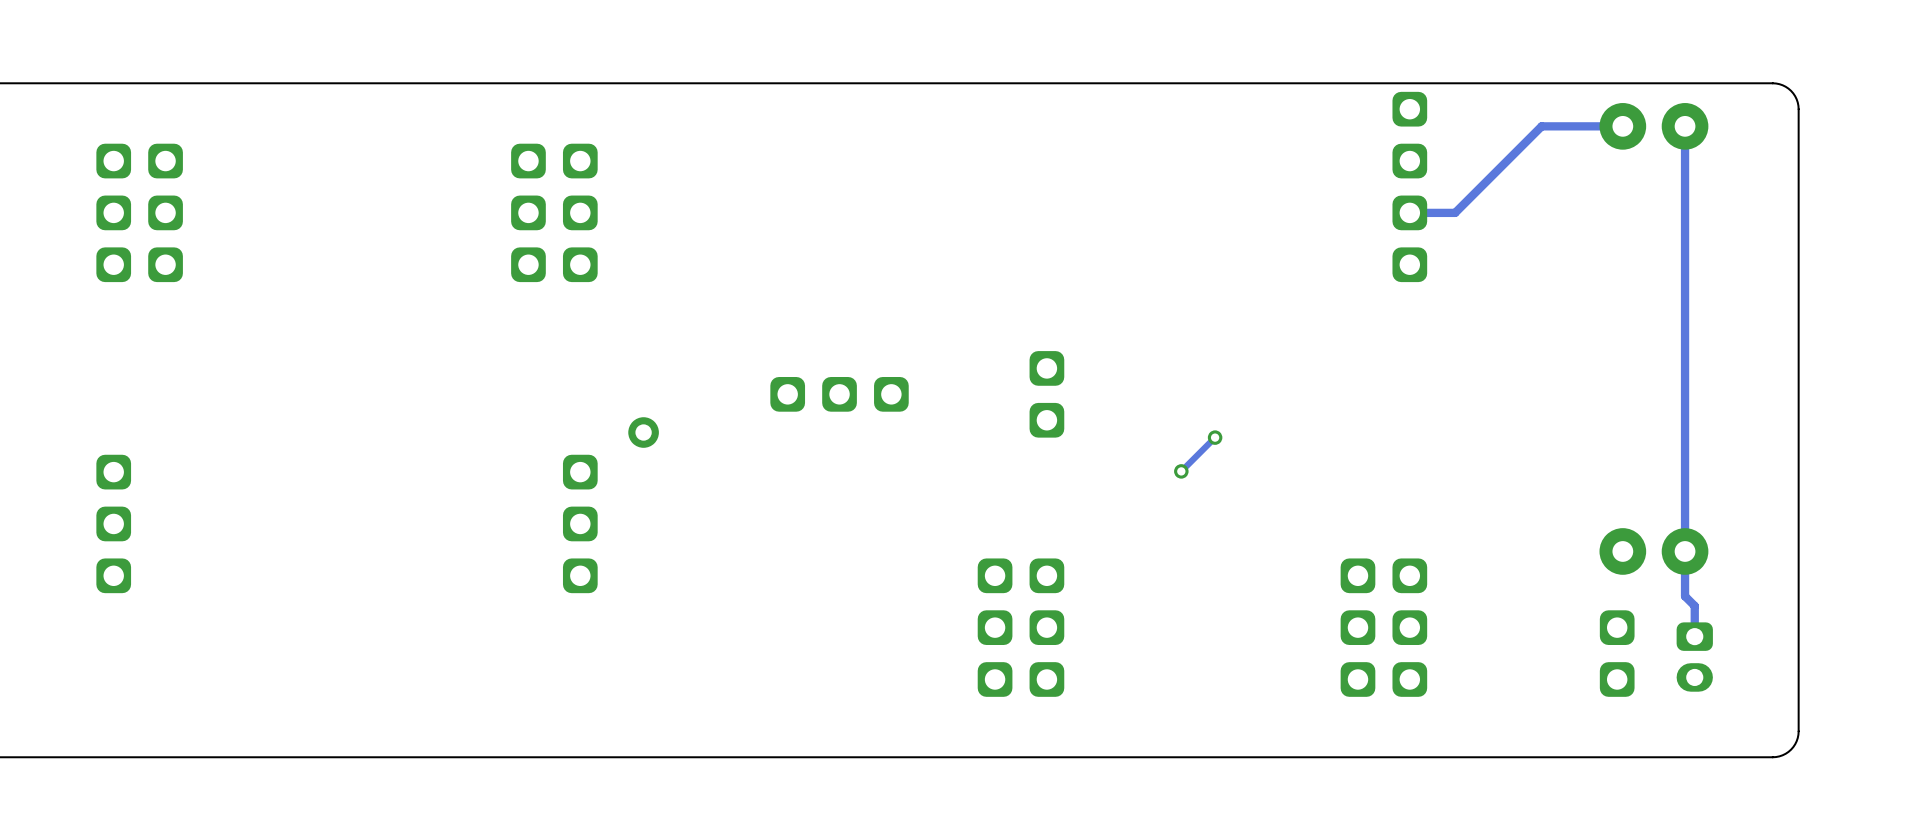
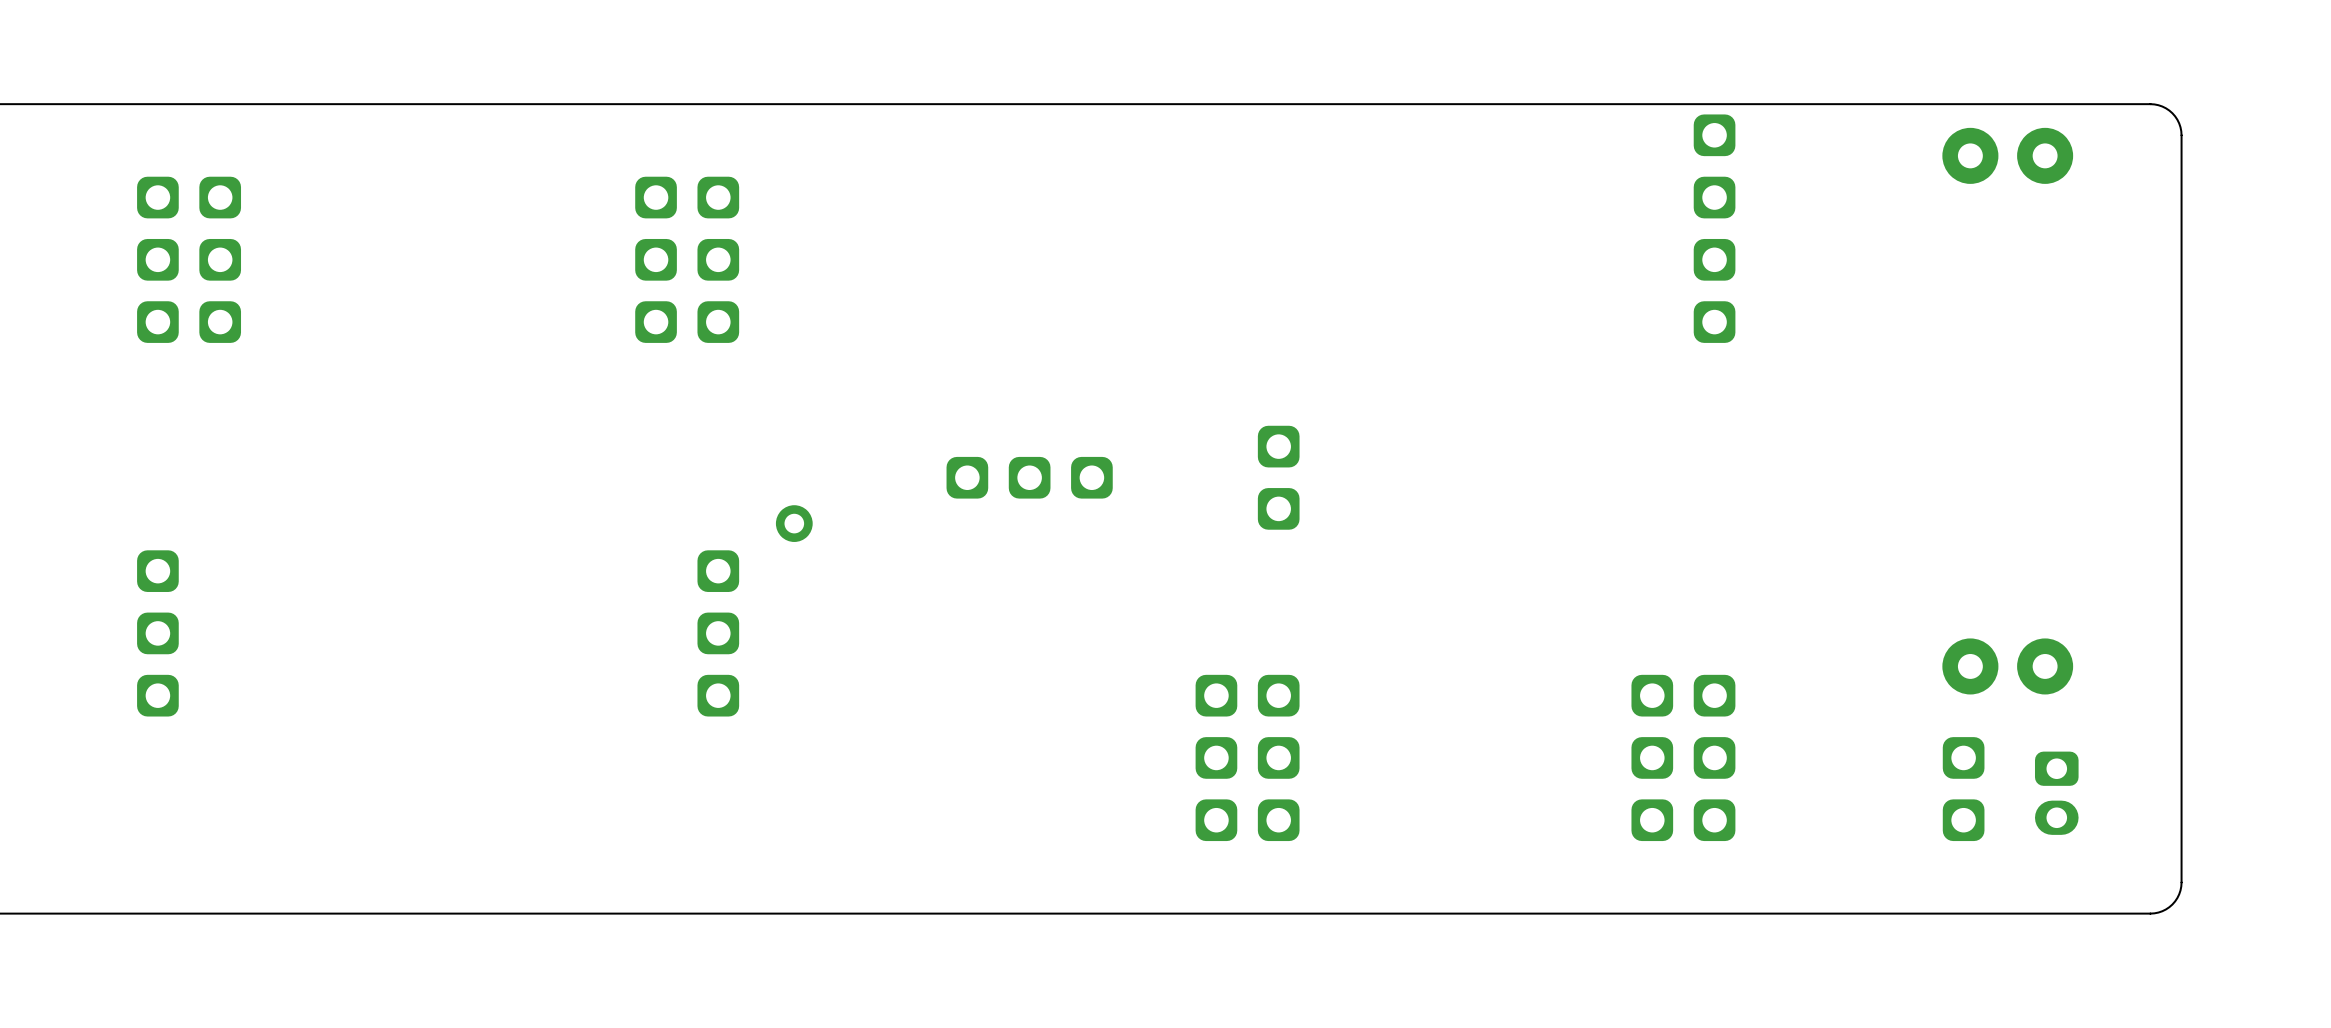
track: (1622, 126) (1541, 126) (1455, 212) (1409, 212) -> none
track: (1685, 126) (1685, 596) (1694, 606) (1694, 636) -> none
track: (1215, 437) (1181, 471) -> none
via: (1215, 437) -> none
via: (1181, 471) -> none

